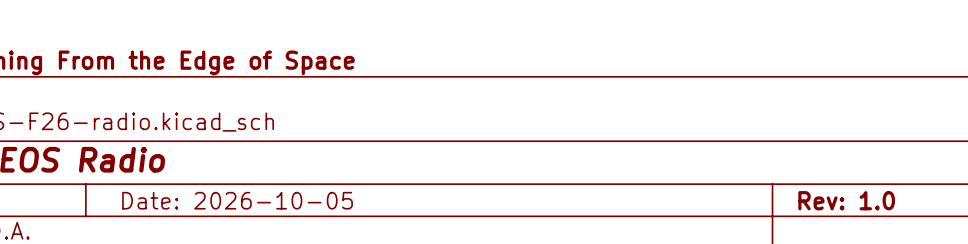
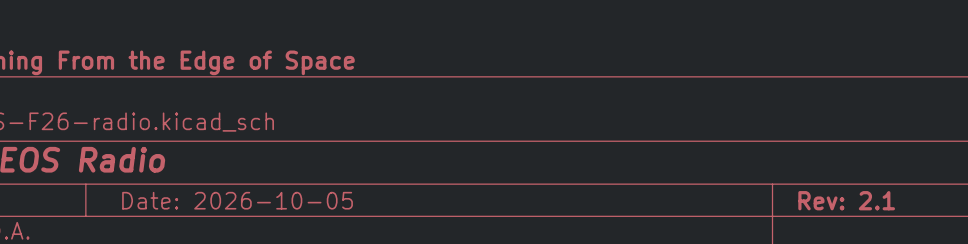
title block: Rev: 1.0 (846, 200) -> Rev: 2.1 (846, 200)

